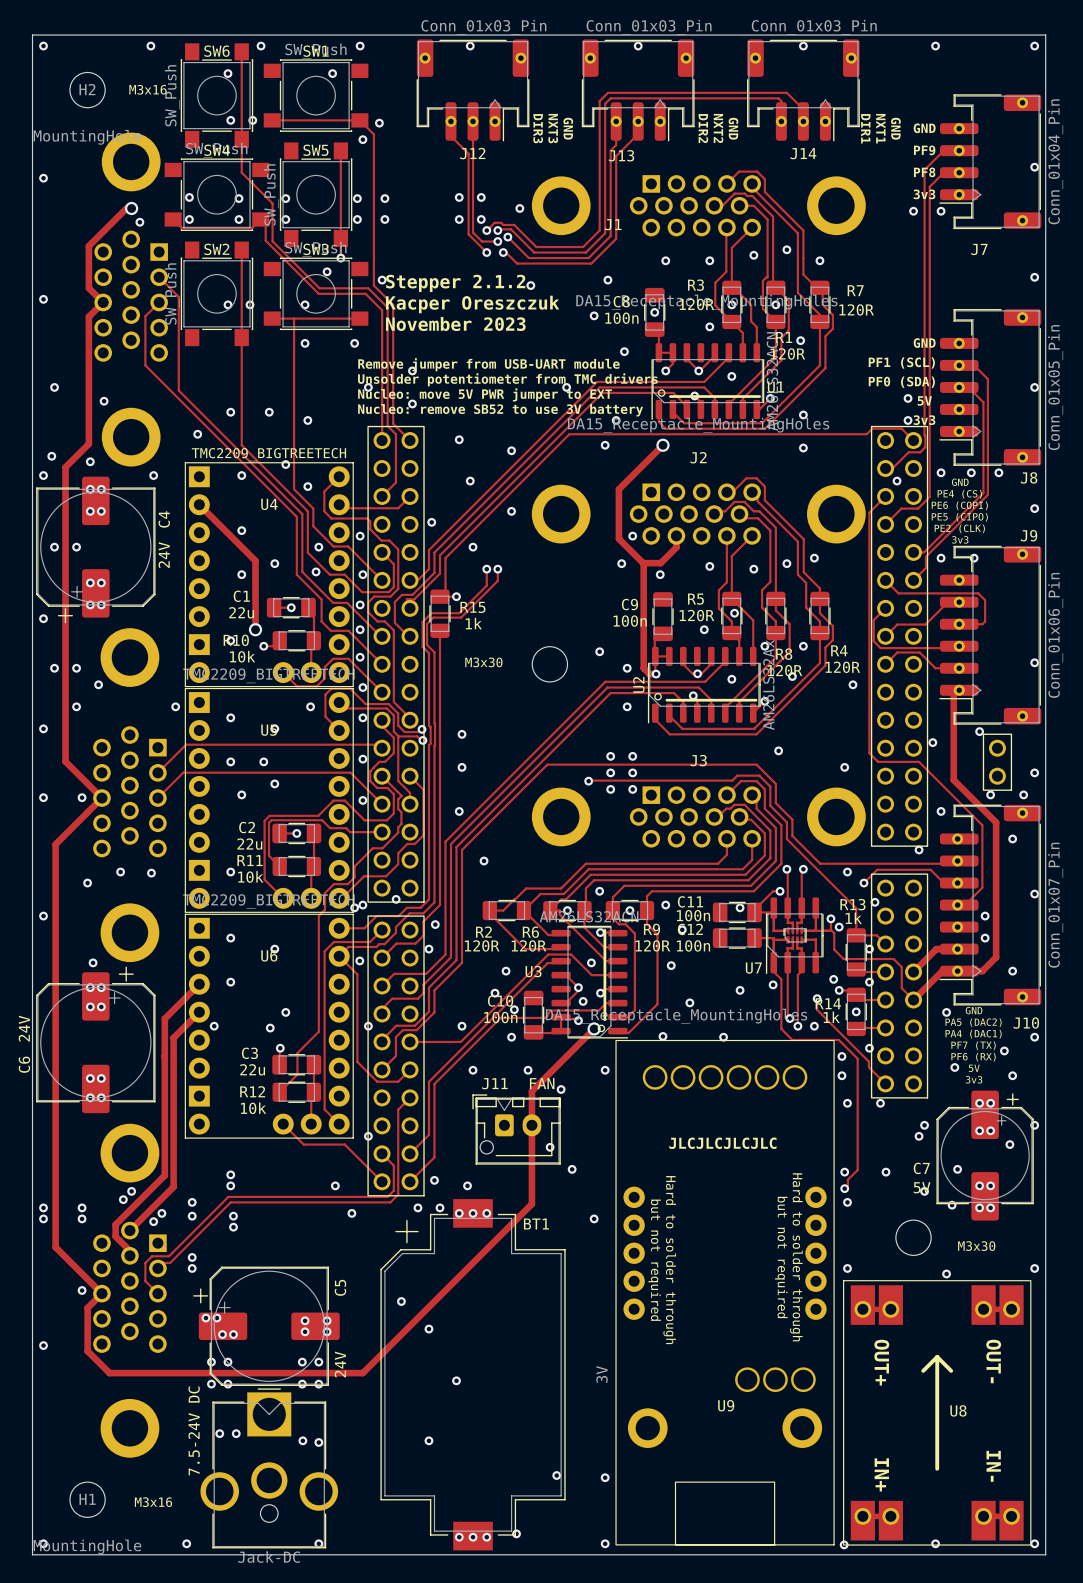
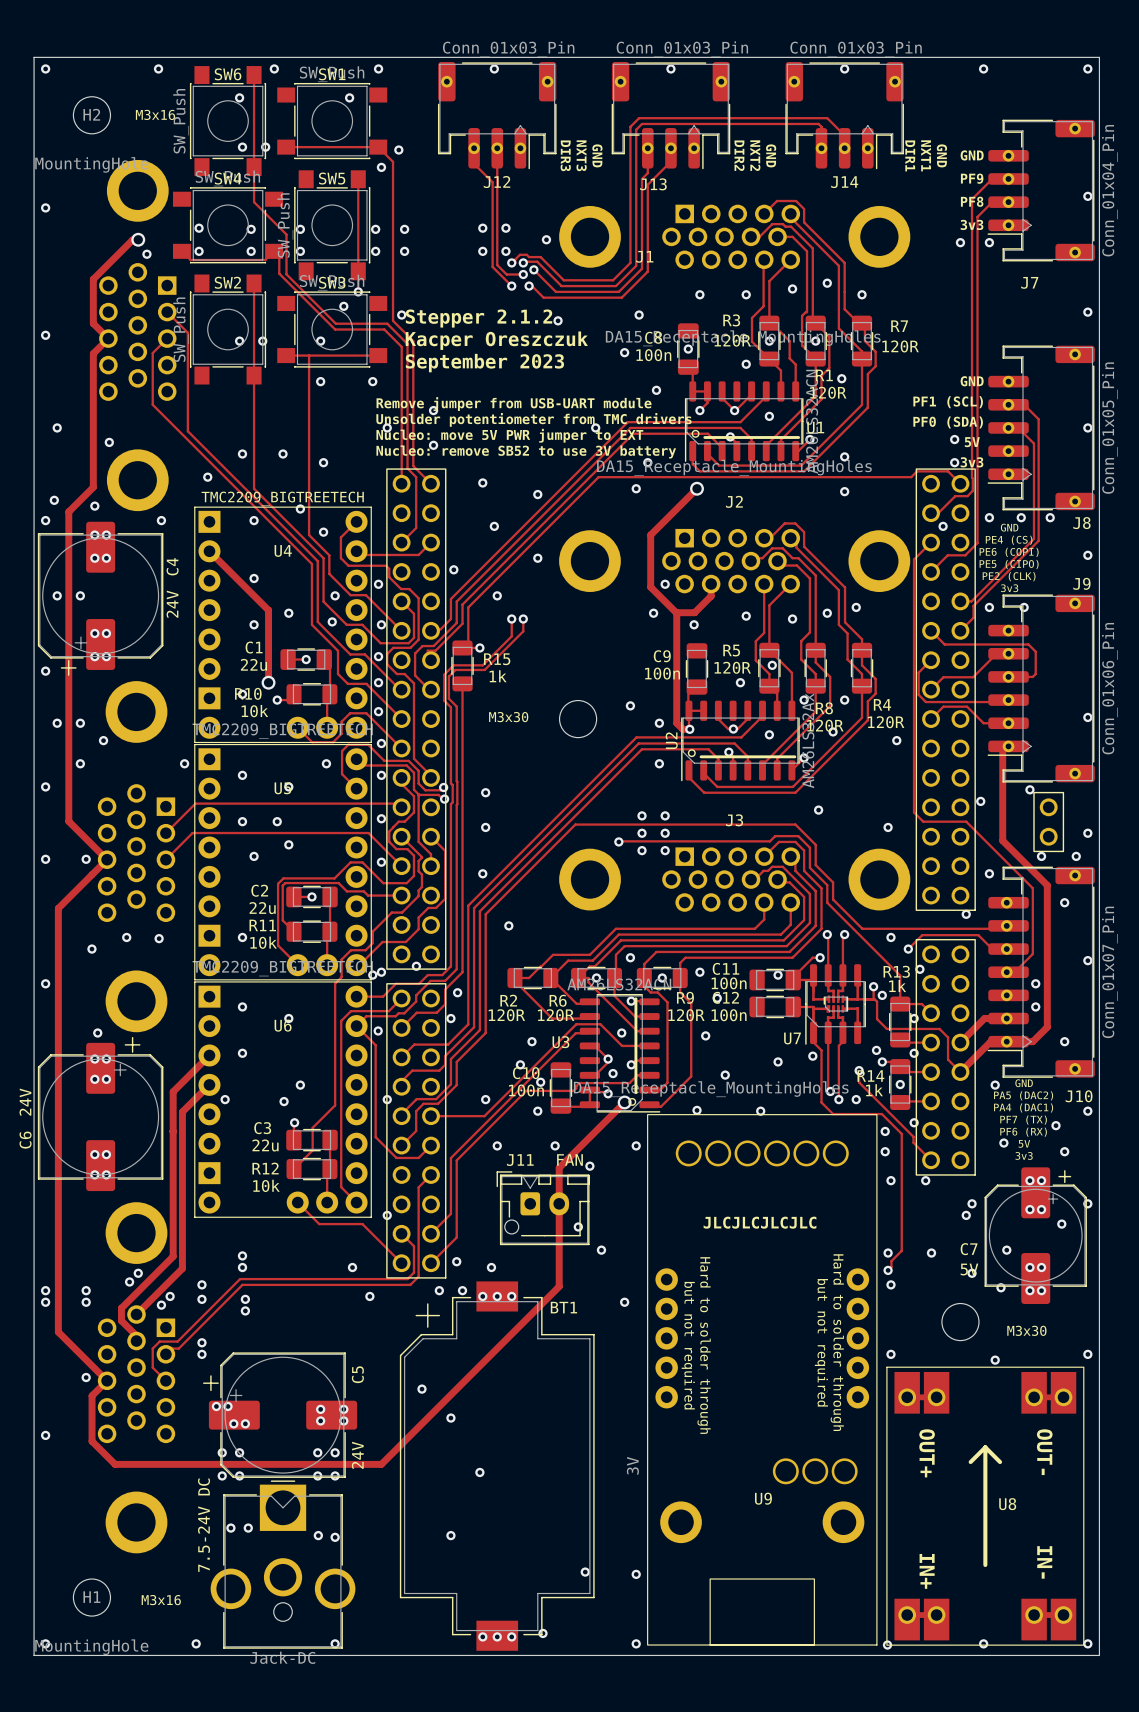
text: November 2023 (455, 324) -> September 2023 (484, 363)

